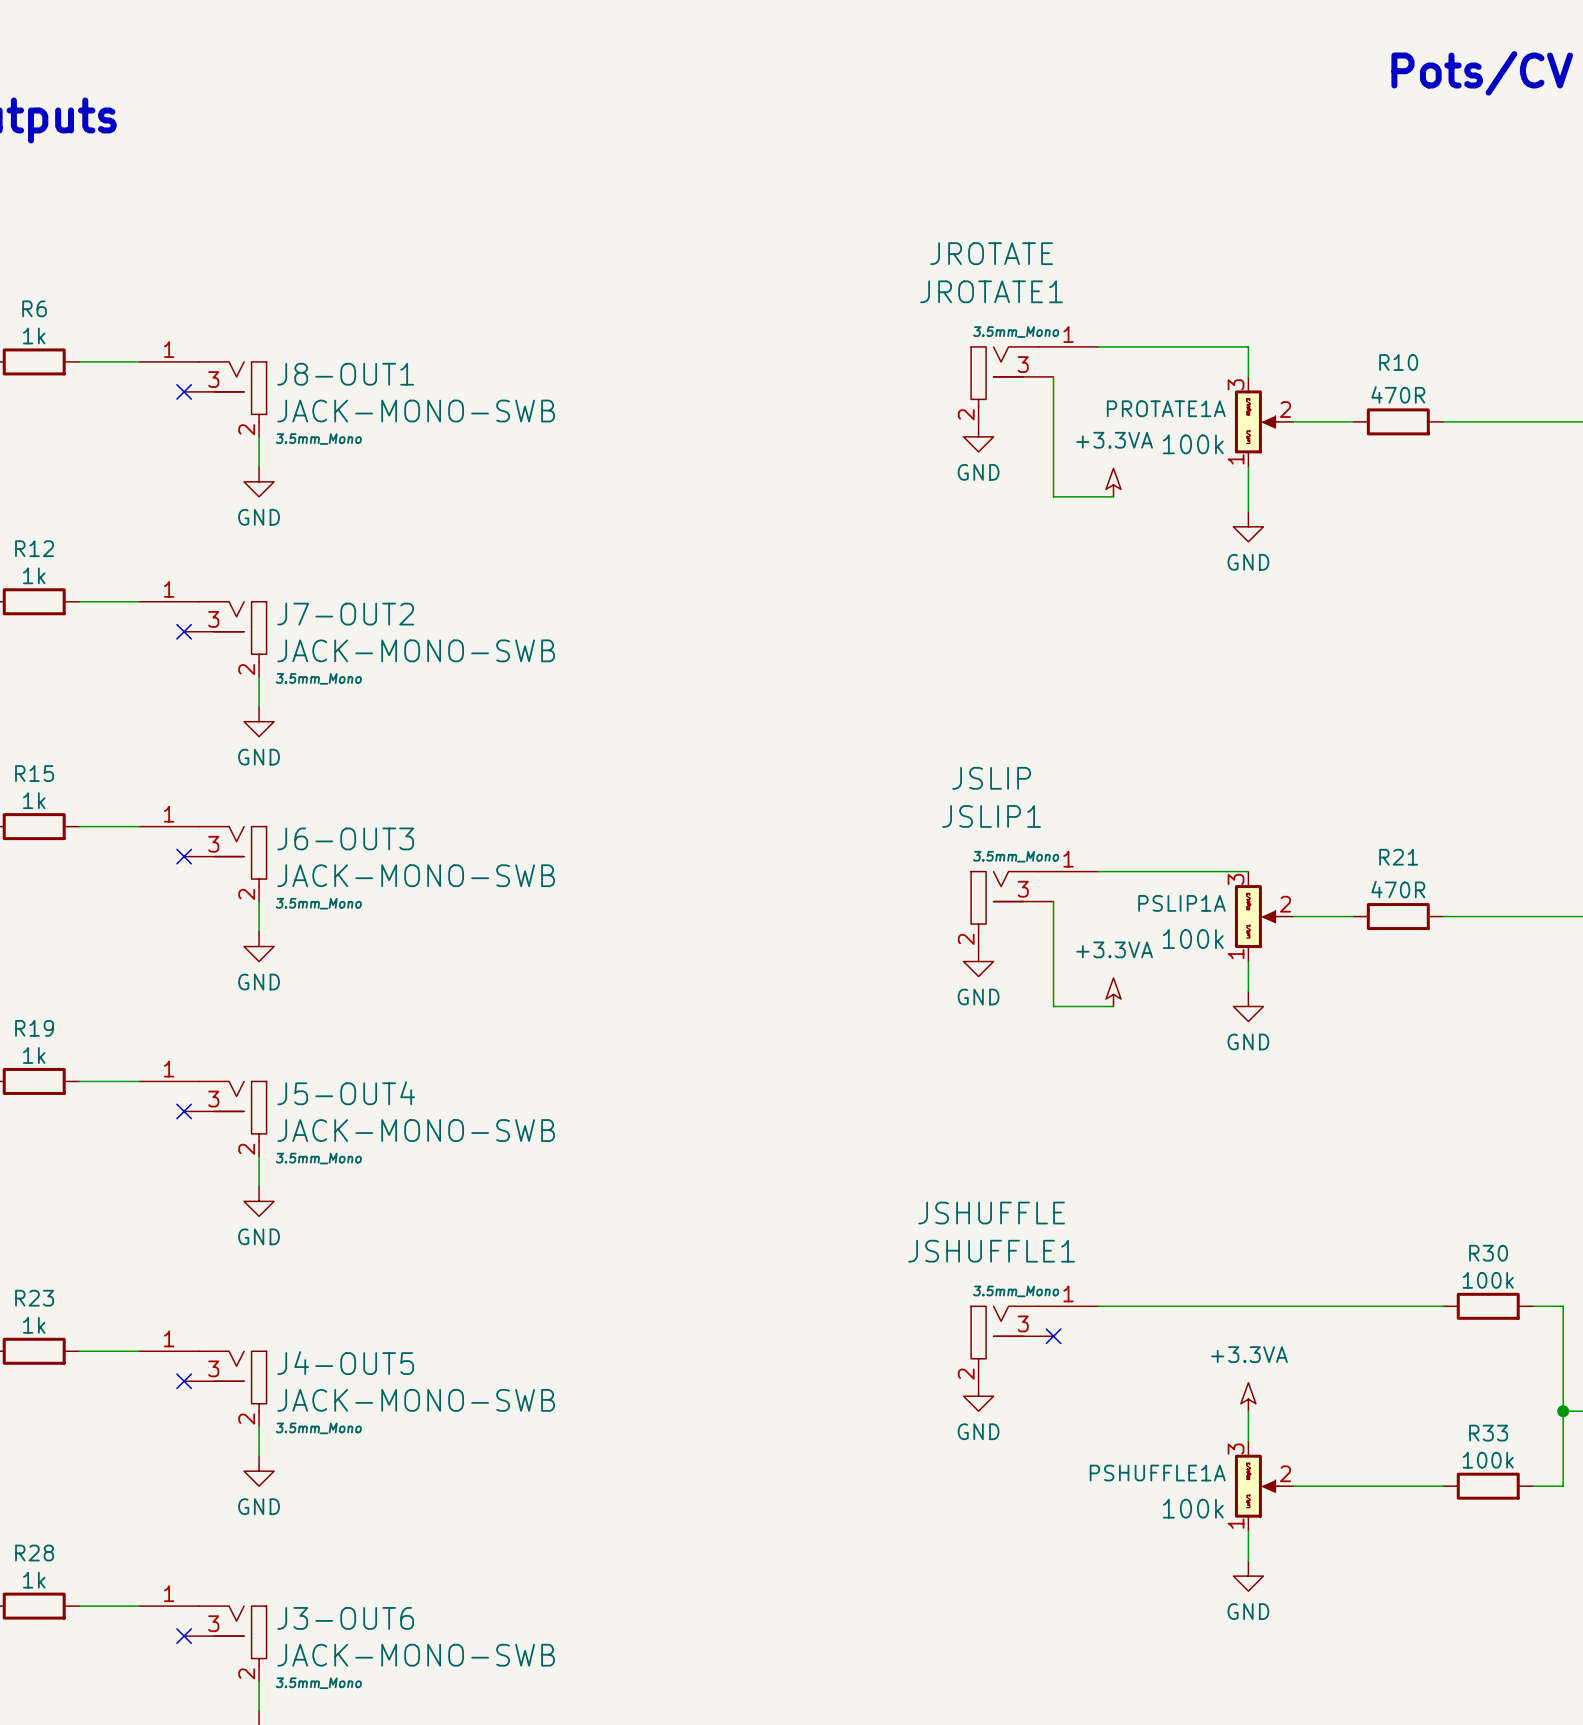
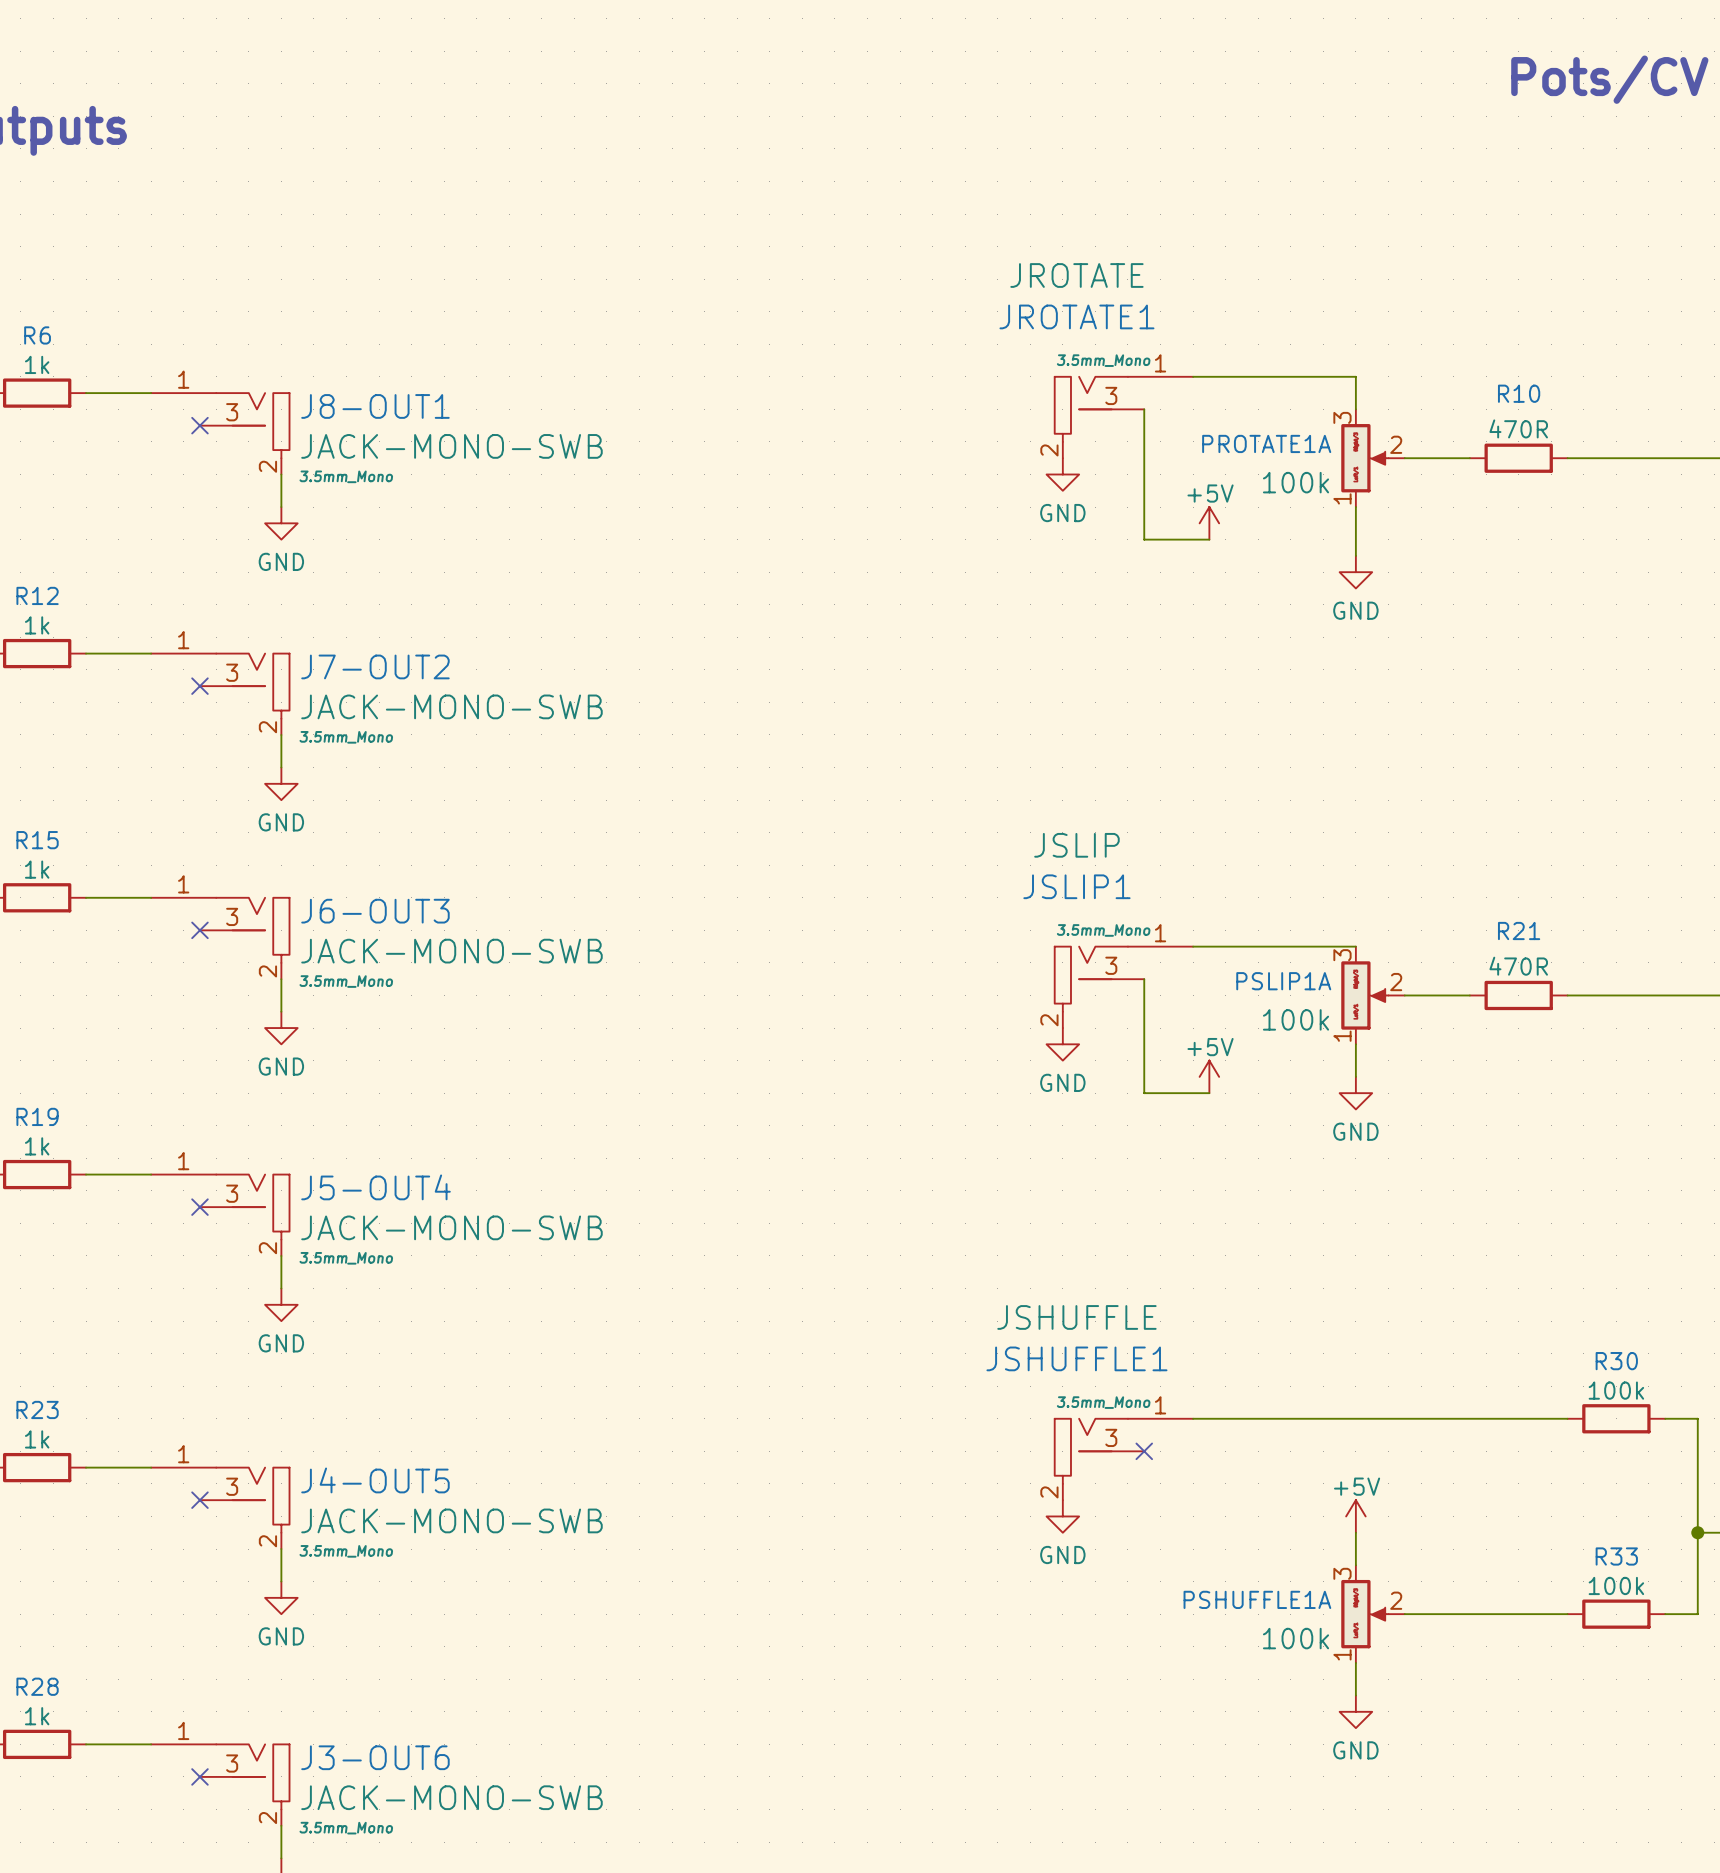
power symbol: +3.3VA (1113, 482) -> +5V (1209, 523)
power symbol: +3.3VA (1113, 992) -> +5V (1209, 1076)
power symbol: +3.3VA (1248, 1396) -> +5V (1355, 1516)

